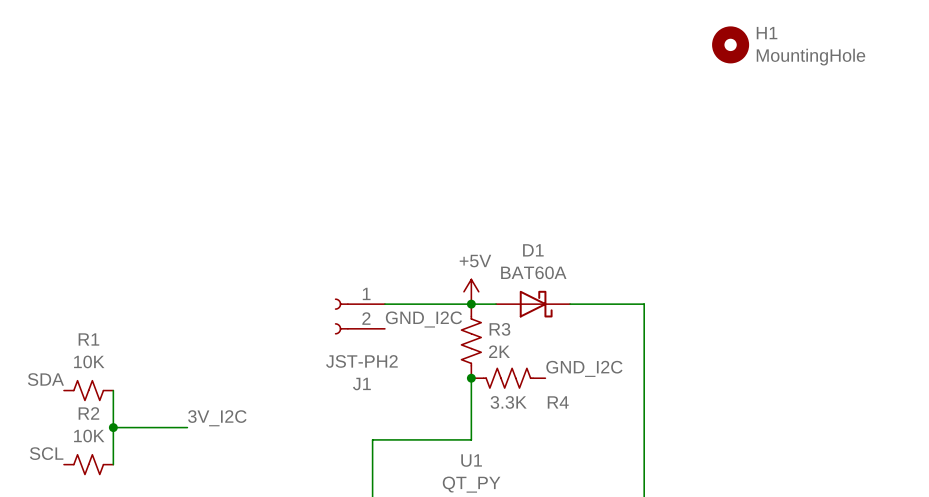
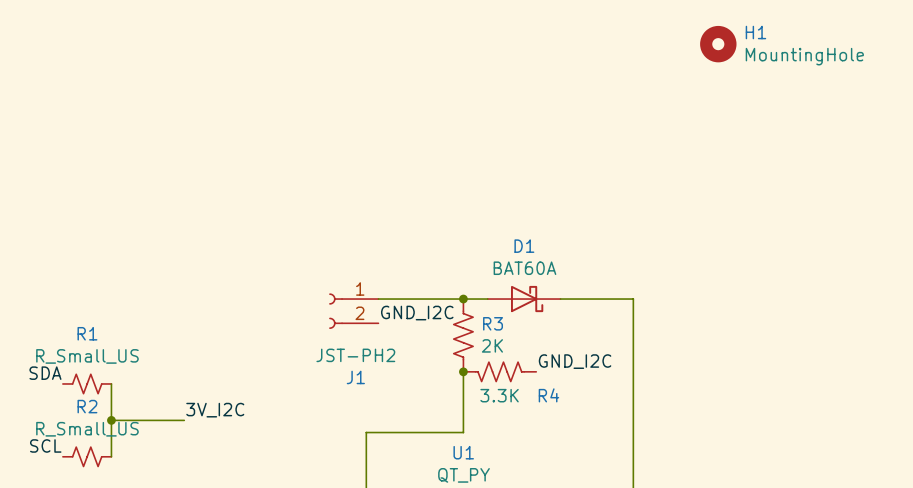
power symbol: +5V (471, 291) -> none
R1 value: 10K (89, 361) -> R_Small_US (87, 356)
R2 value: 10K (89, 436) -> R_Small_US (87, 429)

